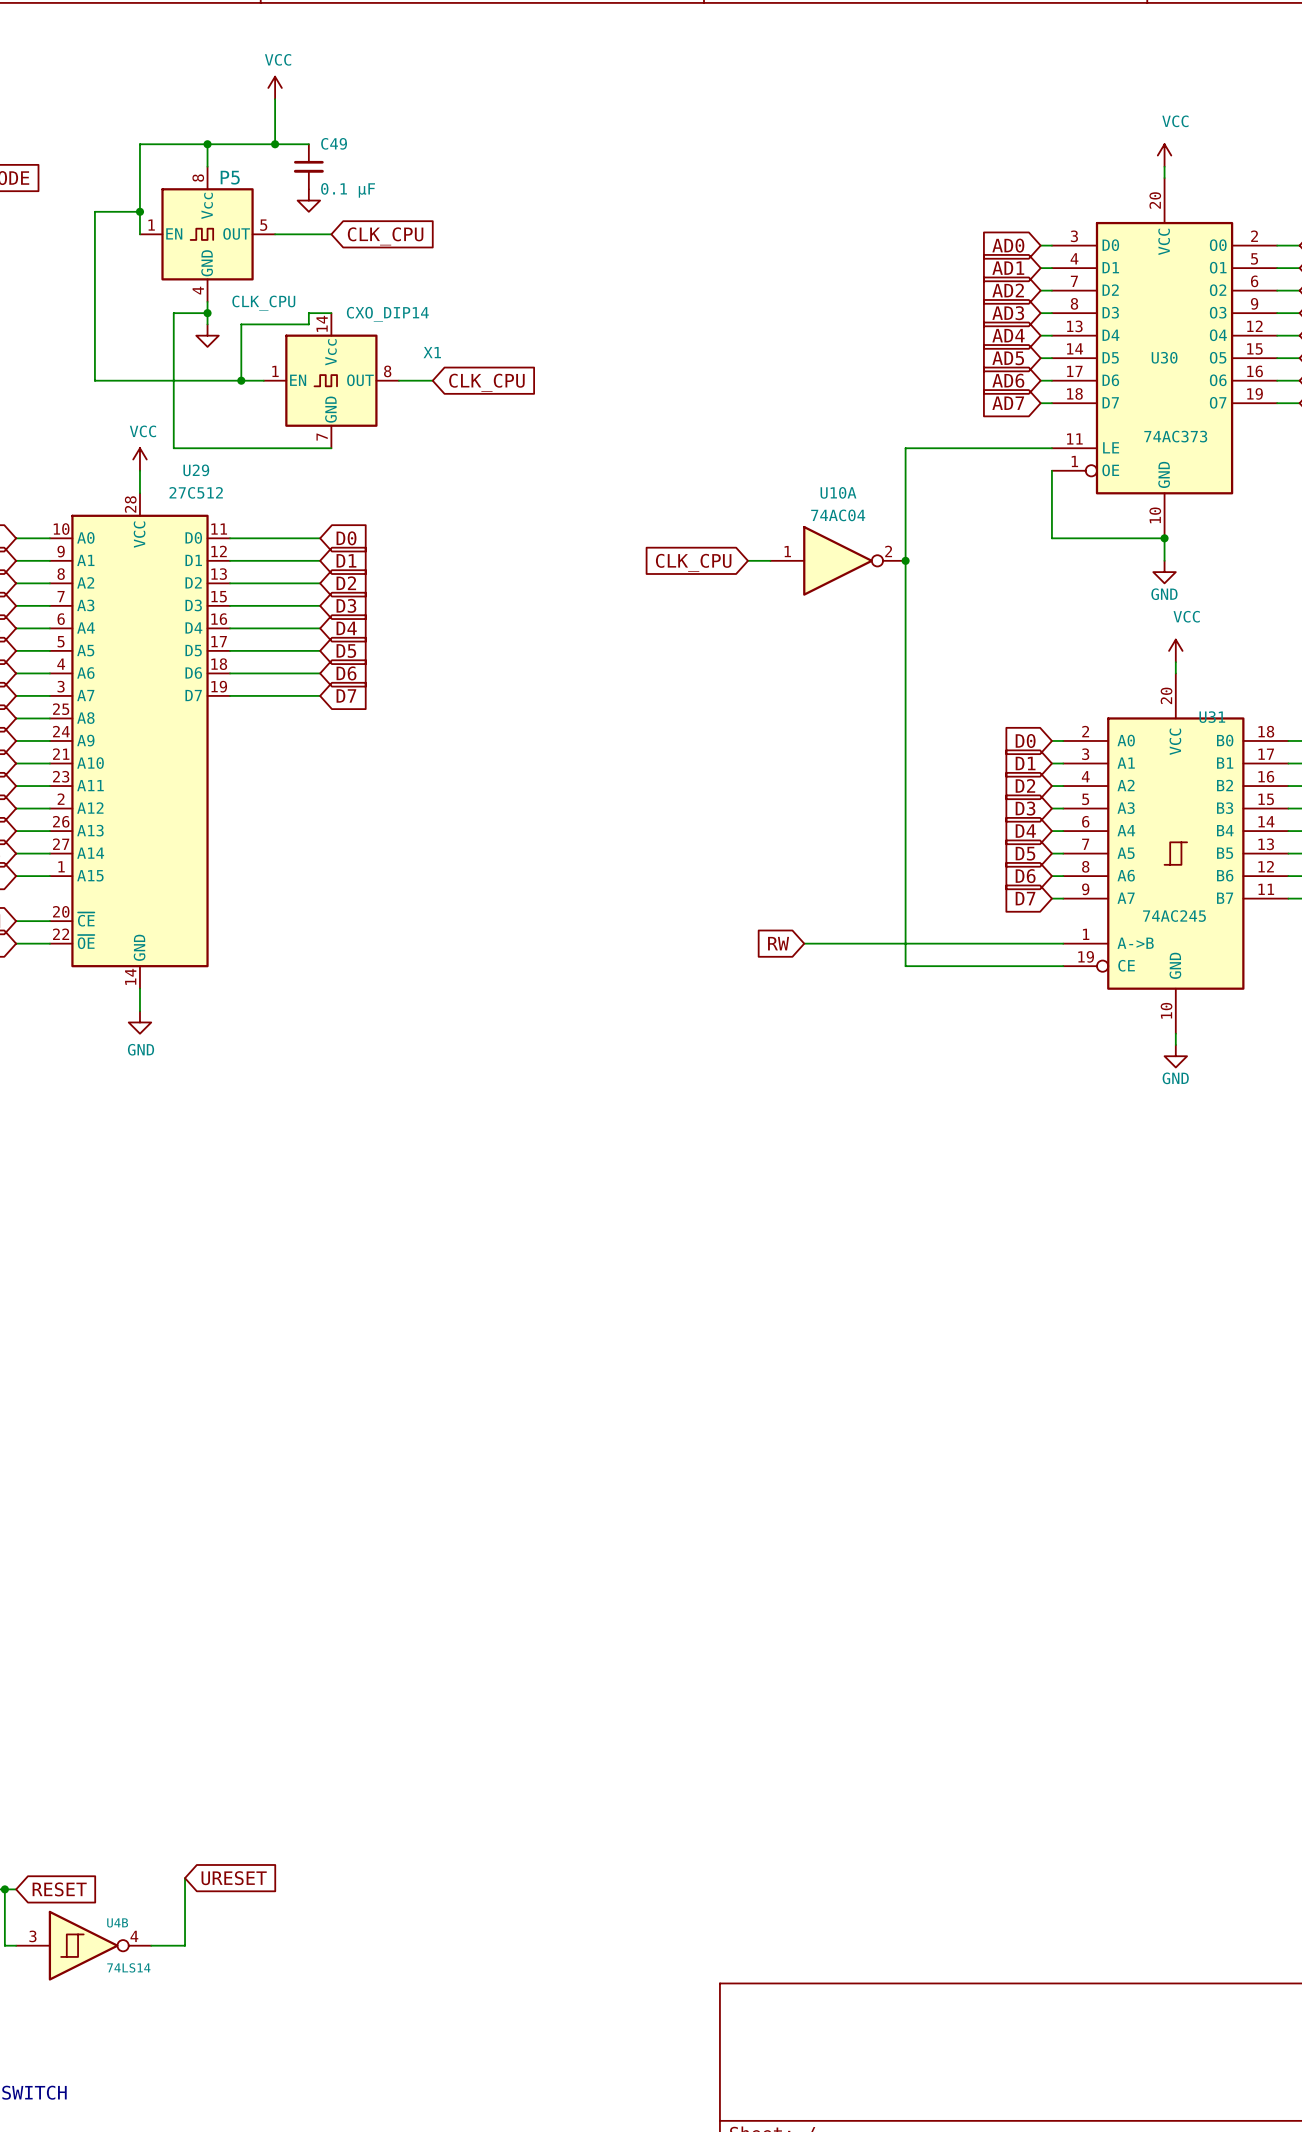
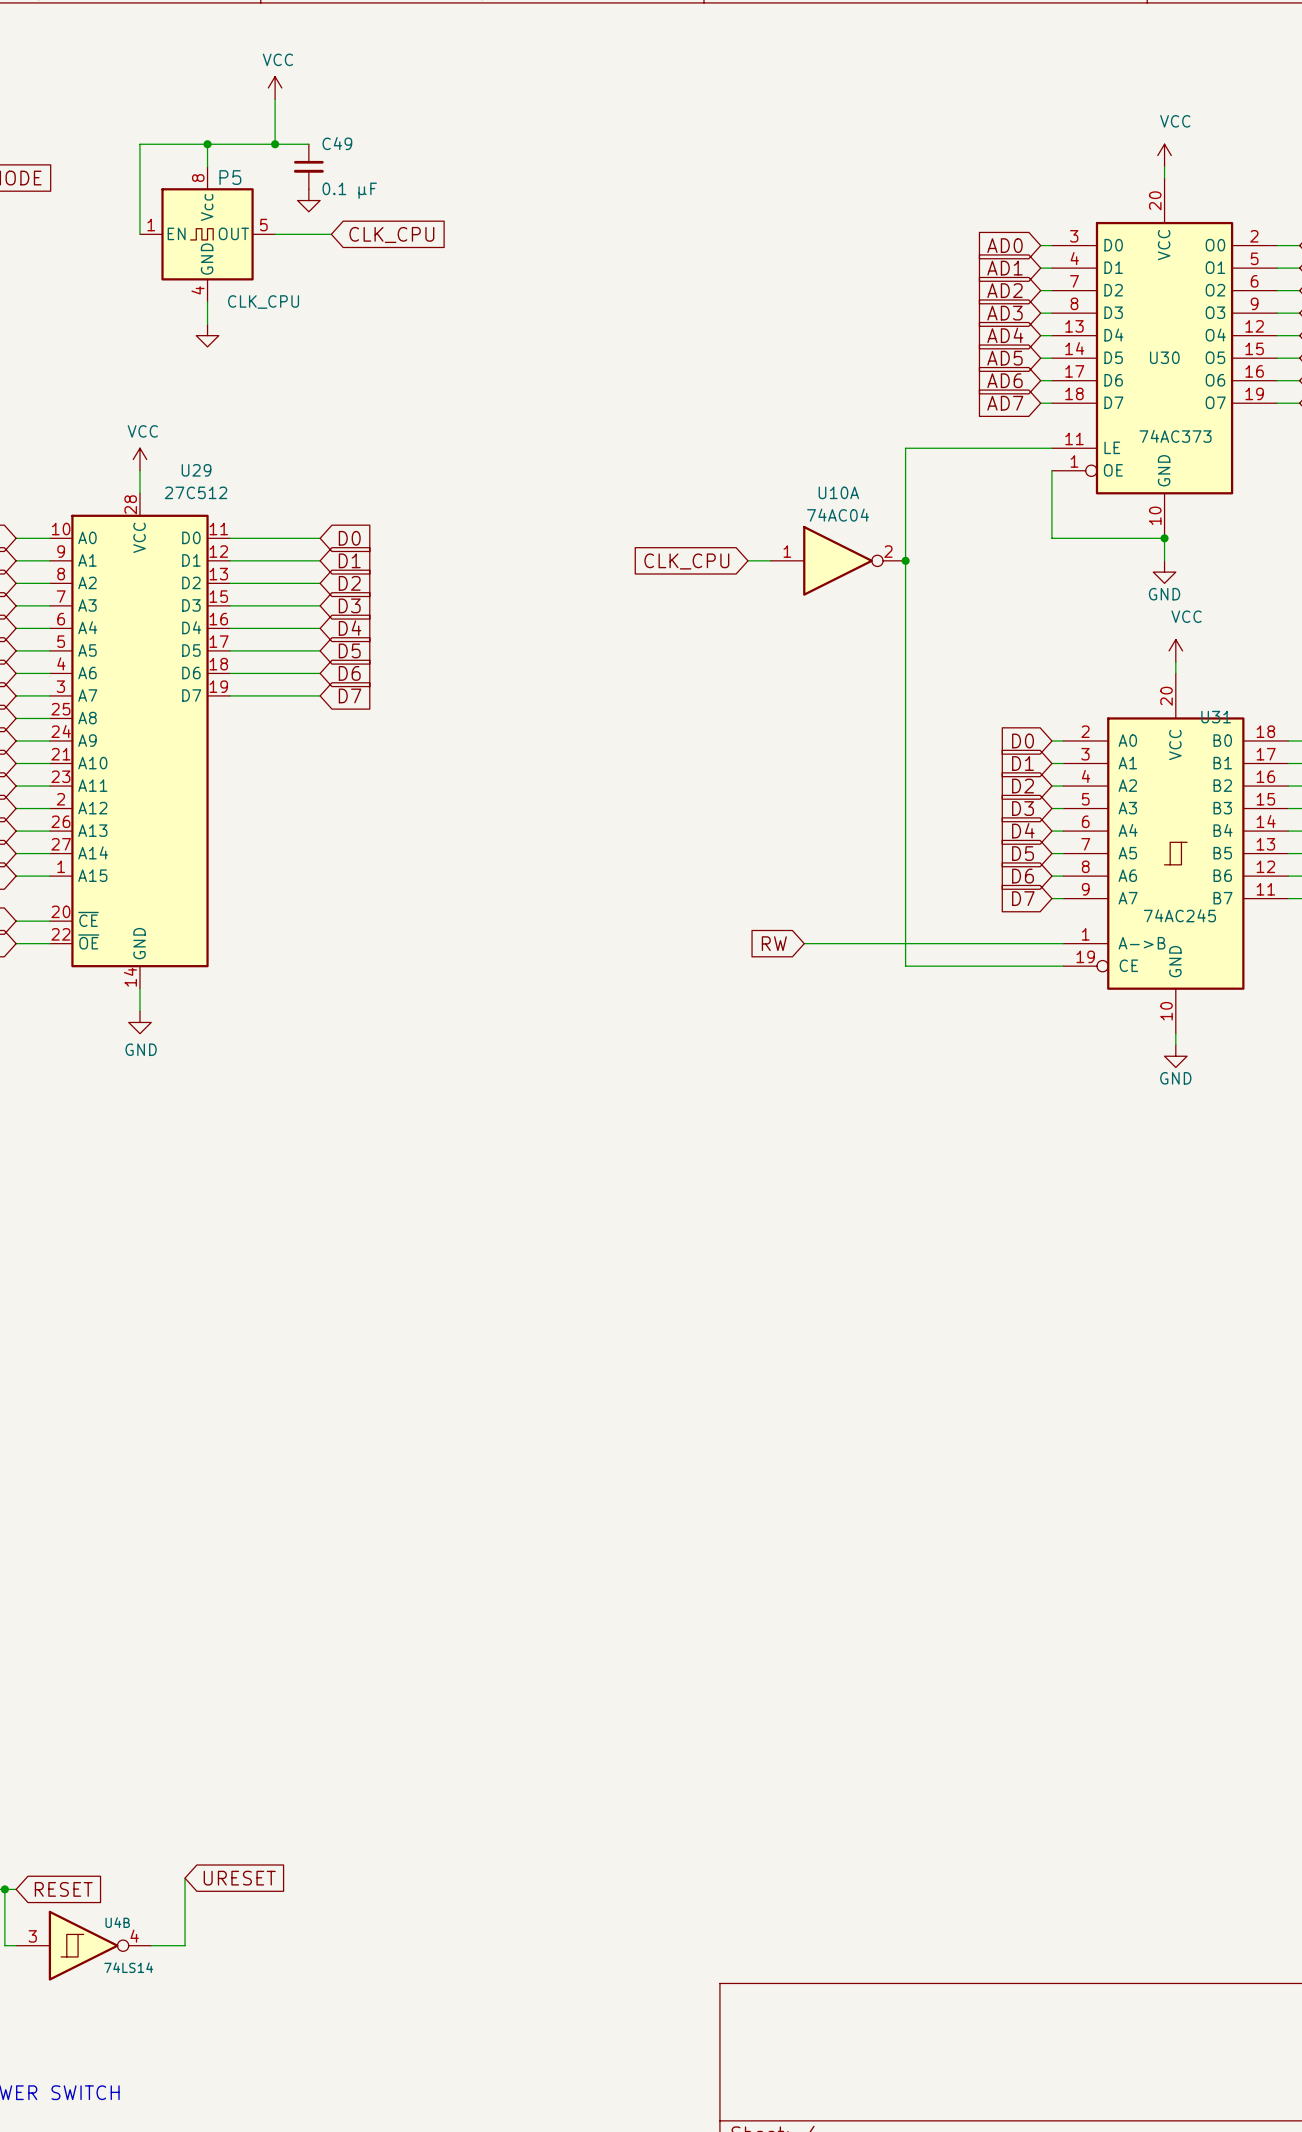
wire: (139, 211) (94, 211) (94, 380) (263, 380) -> none
junction: (139, 211) -> none
wire: (207, 313) (173, 313) (173, 448) (331, 448) -> none
junction: (207, 313) -> none
wire: (331, 313) (308, 313) (308, 324) (241, 324) (241, 380) -> none
junction: (241, 380) -> none
X1: CXO_DIP14 (331, 380) -> none
wire: (398, 380) (432, 380) -> none
global label: CLK_CPU (486, 382) -> none

